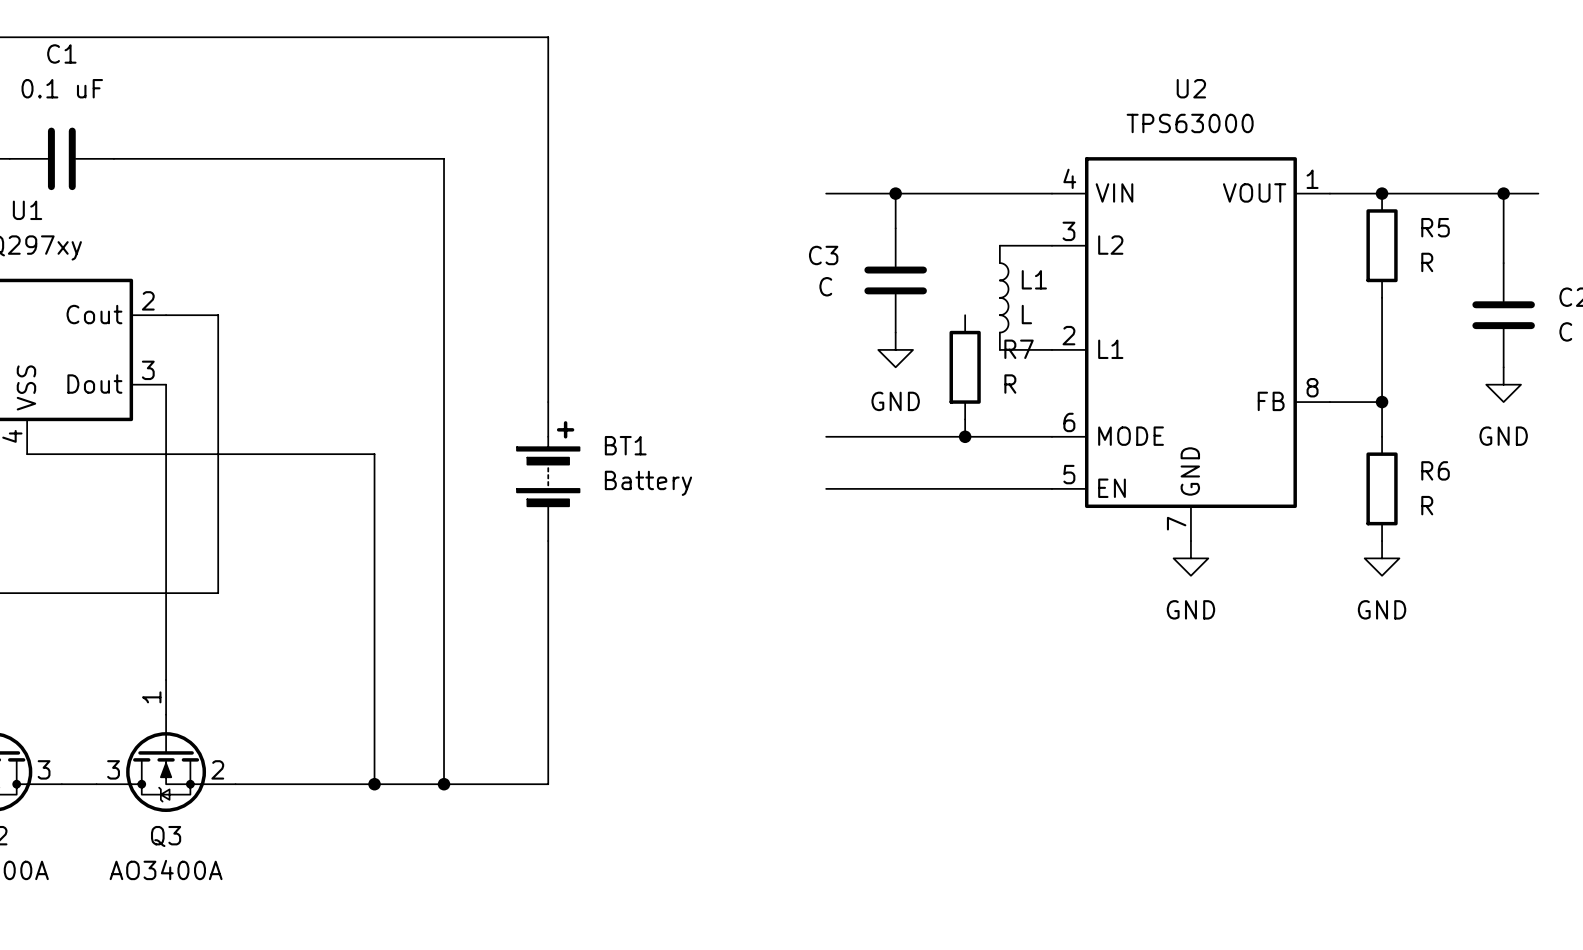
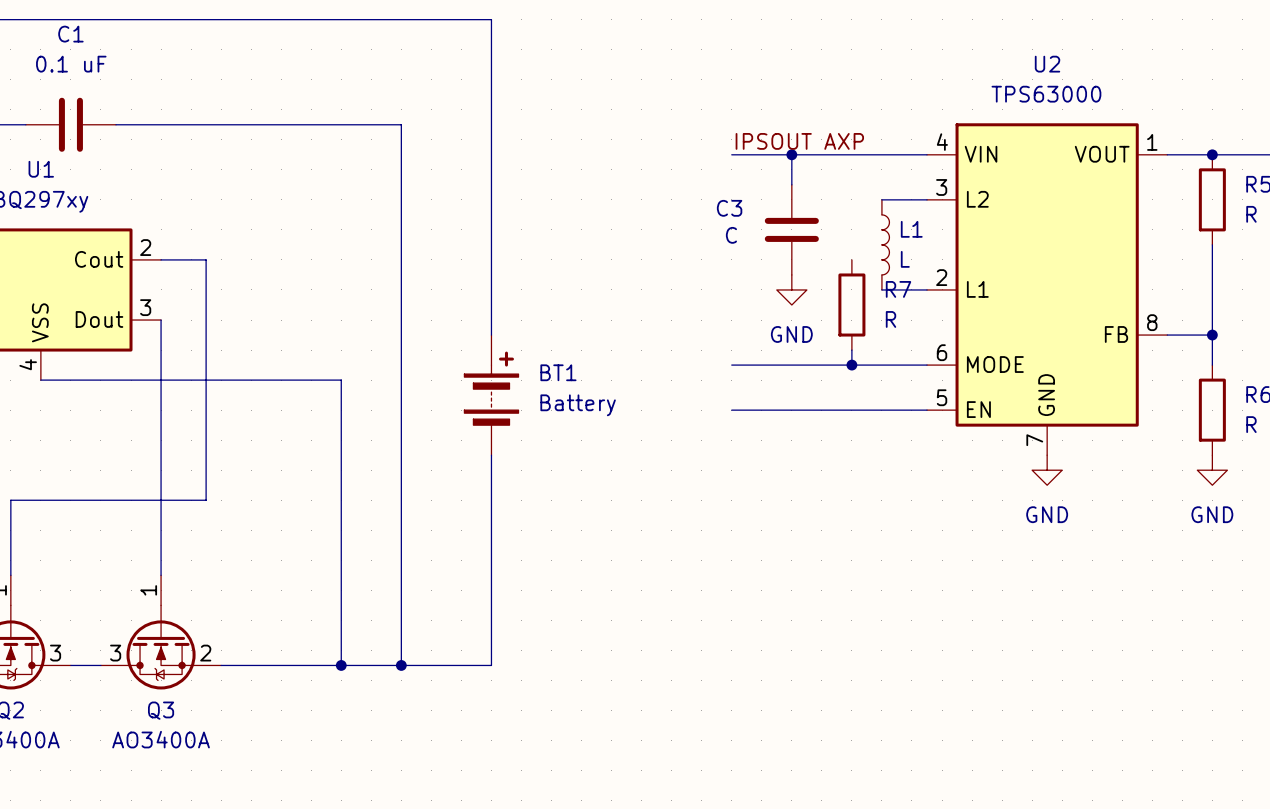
label: none -> IPSOUT AXP (799, 141)

